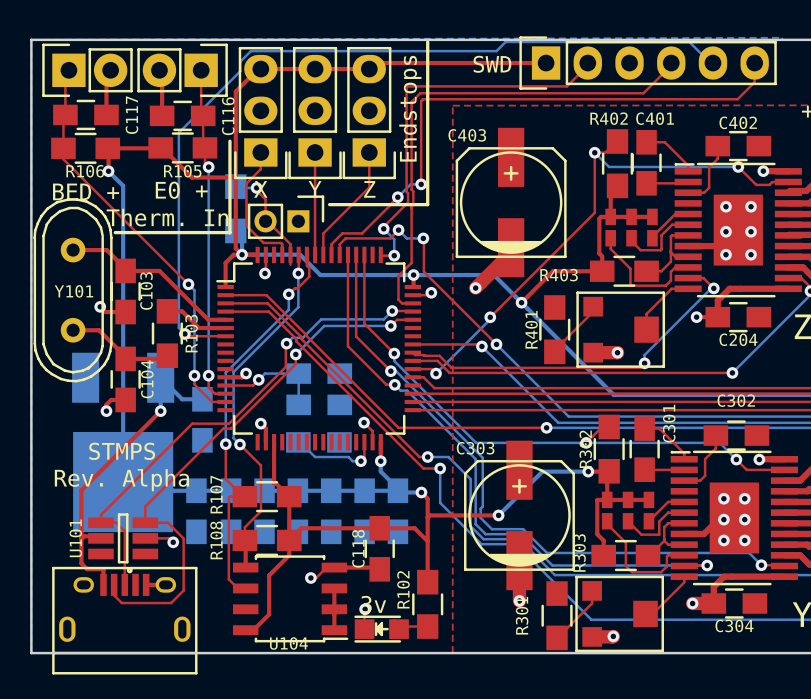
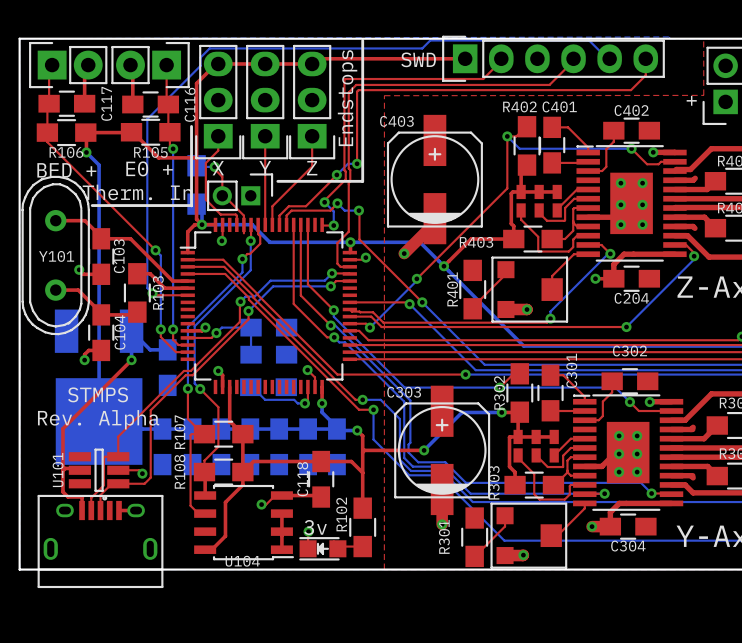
top track: (221, 423) (192, 423) (100, 514) (100, 522) (116, 522) (124, 531) (124, 567) -> (183, 370) (118, 436) (118, 442)
top track: (182, 469) (145, 506) -> (150, 410) (150, 477) (144, 483) (118, 483)
top track: (145, 522) (167, 522) (183, 538) (183, 590) (171, 603) (121, 603) (114, 595) (114, 584) -> (118, 456) (103, 457) (103, 485) (91, 497) (91, 510)
top track: none -> (111, 483) (100, 495)

